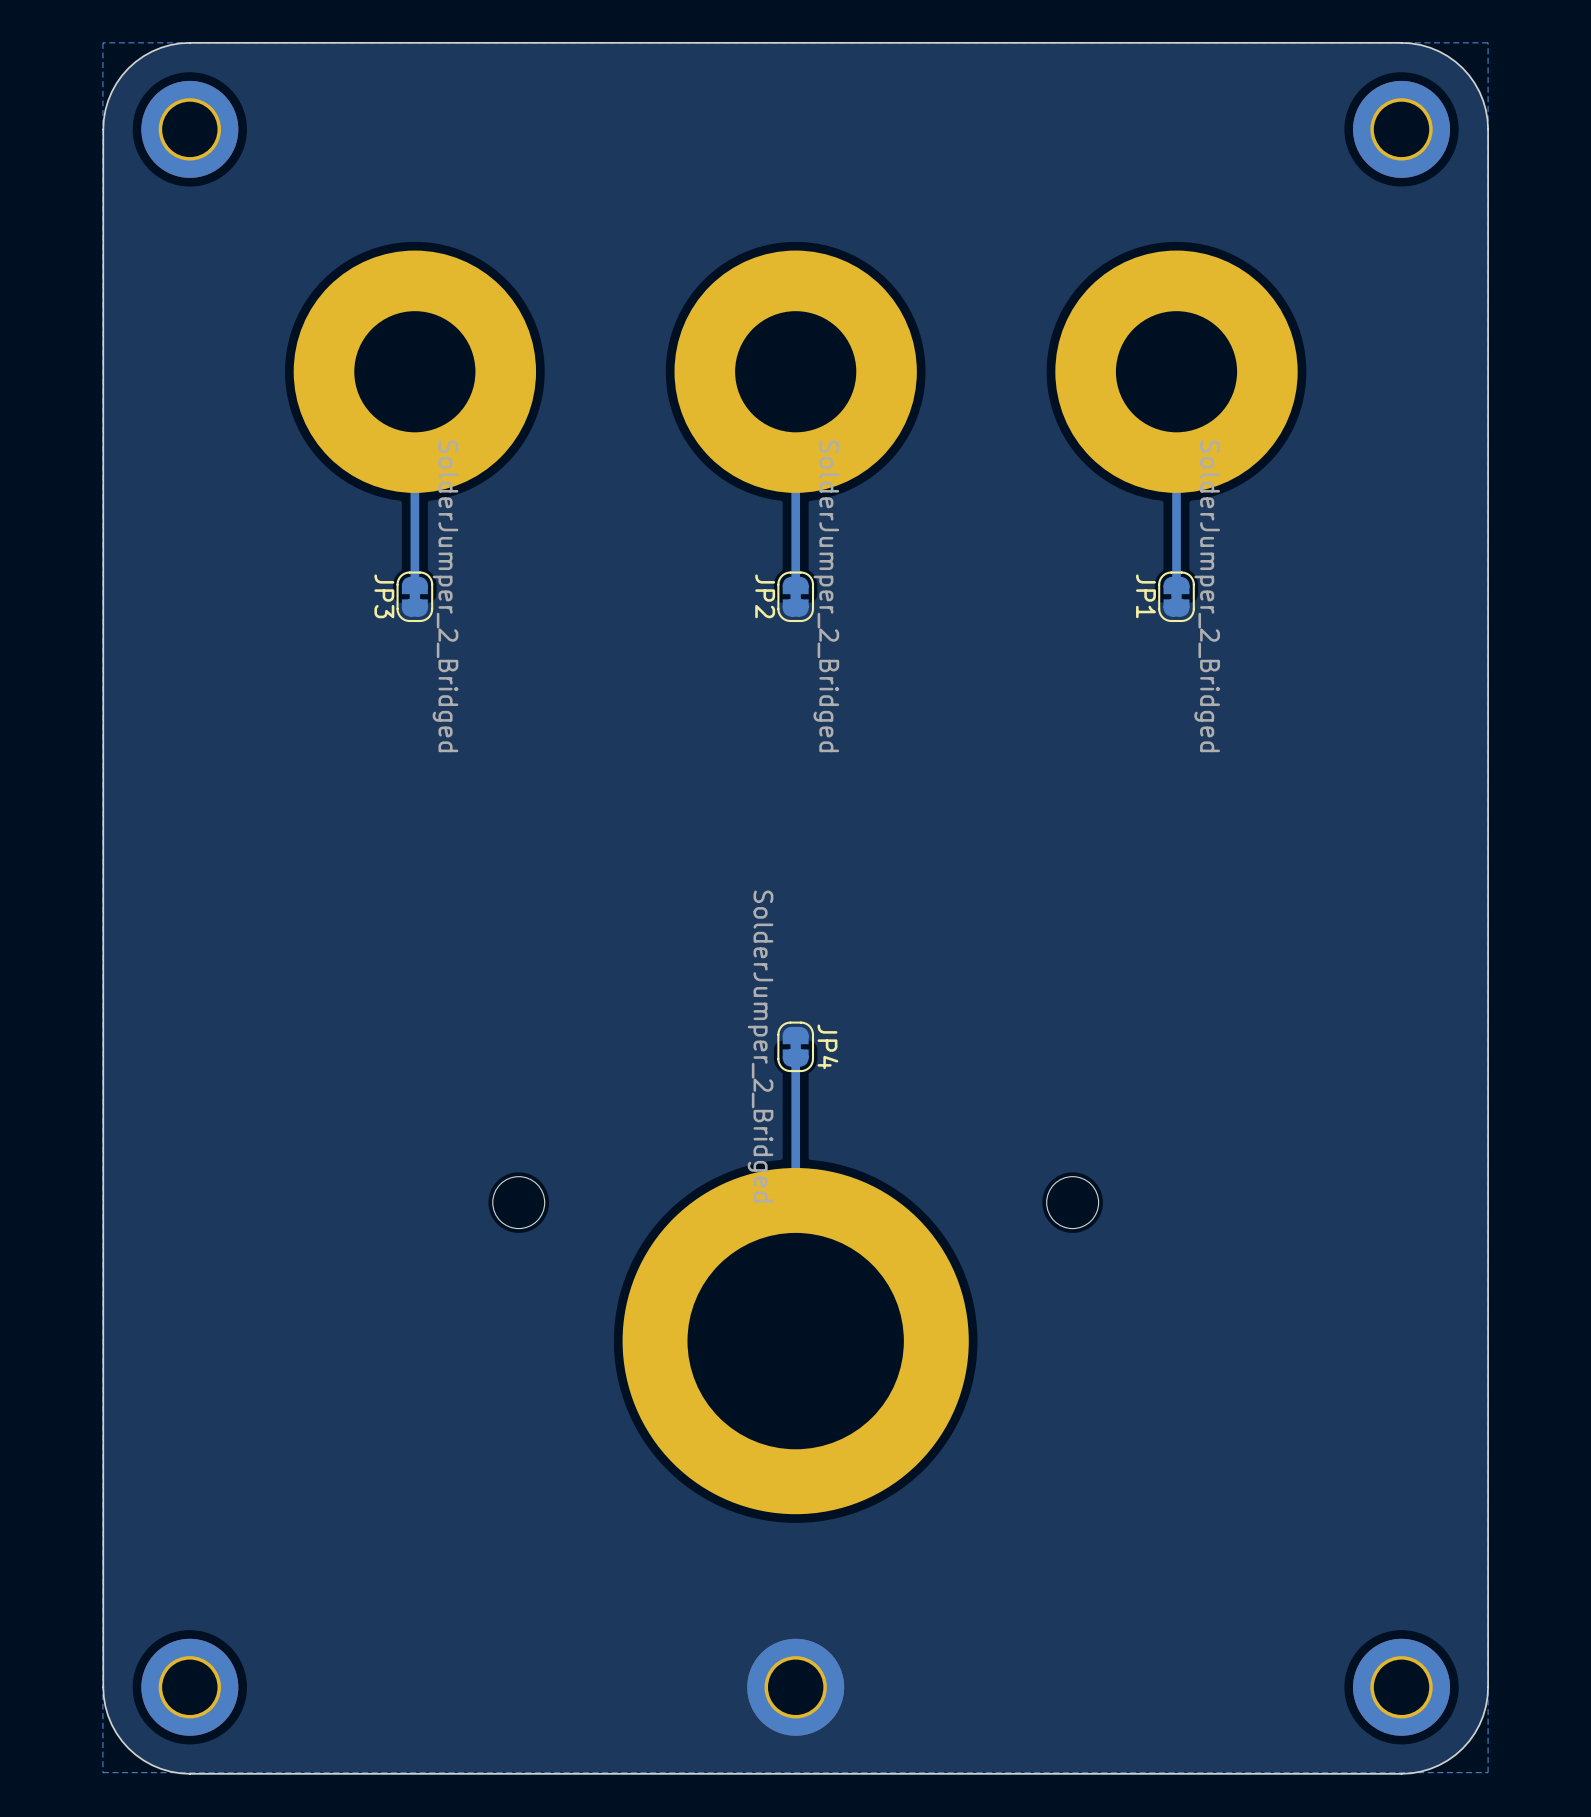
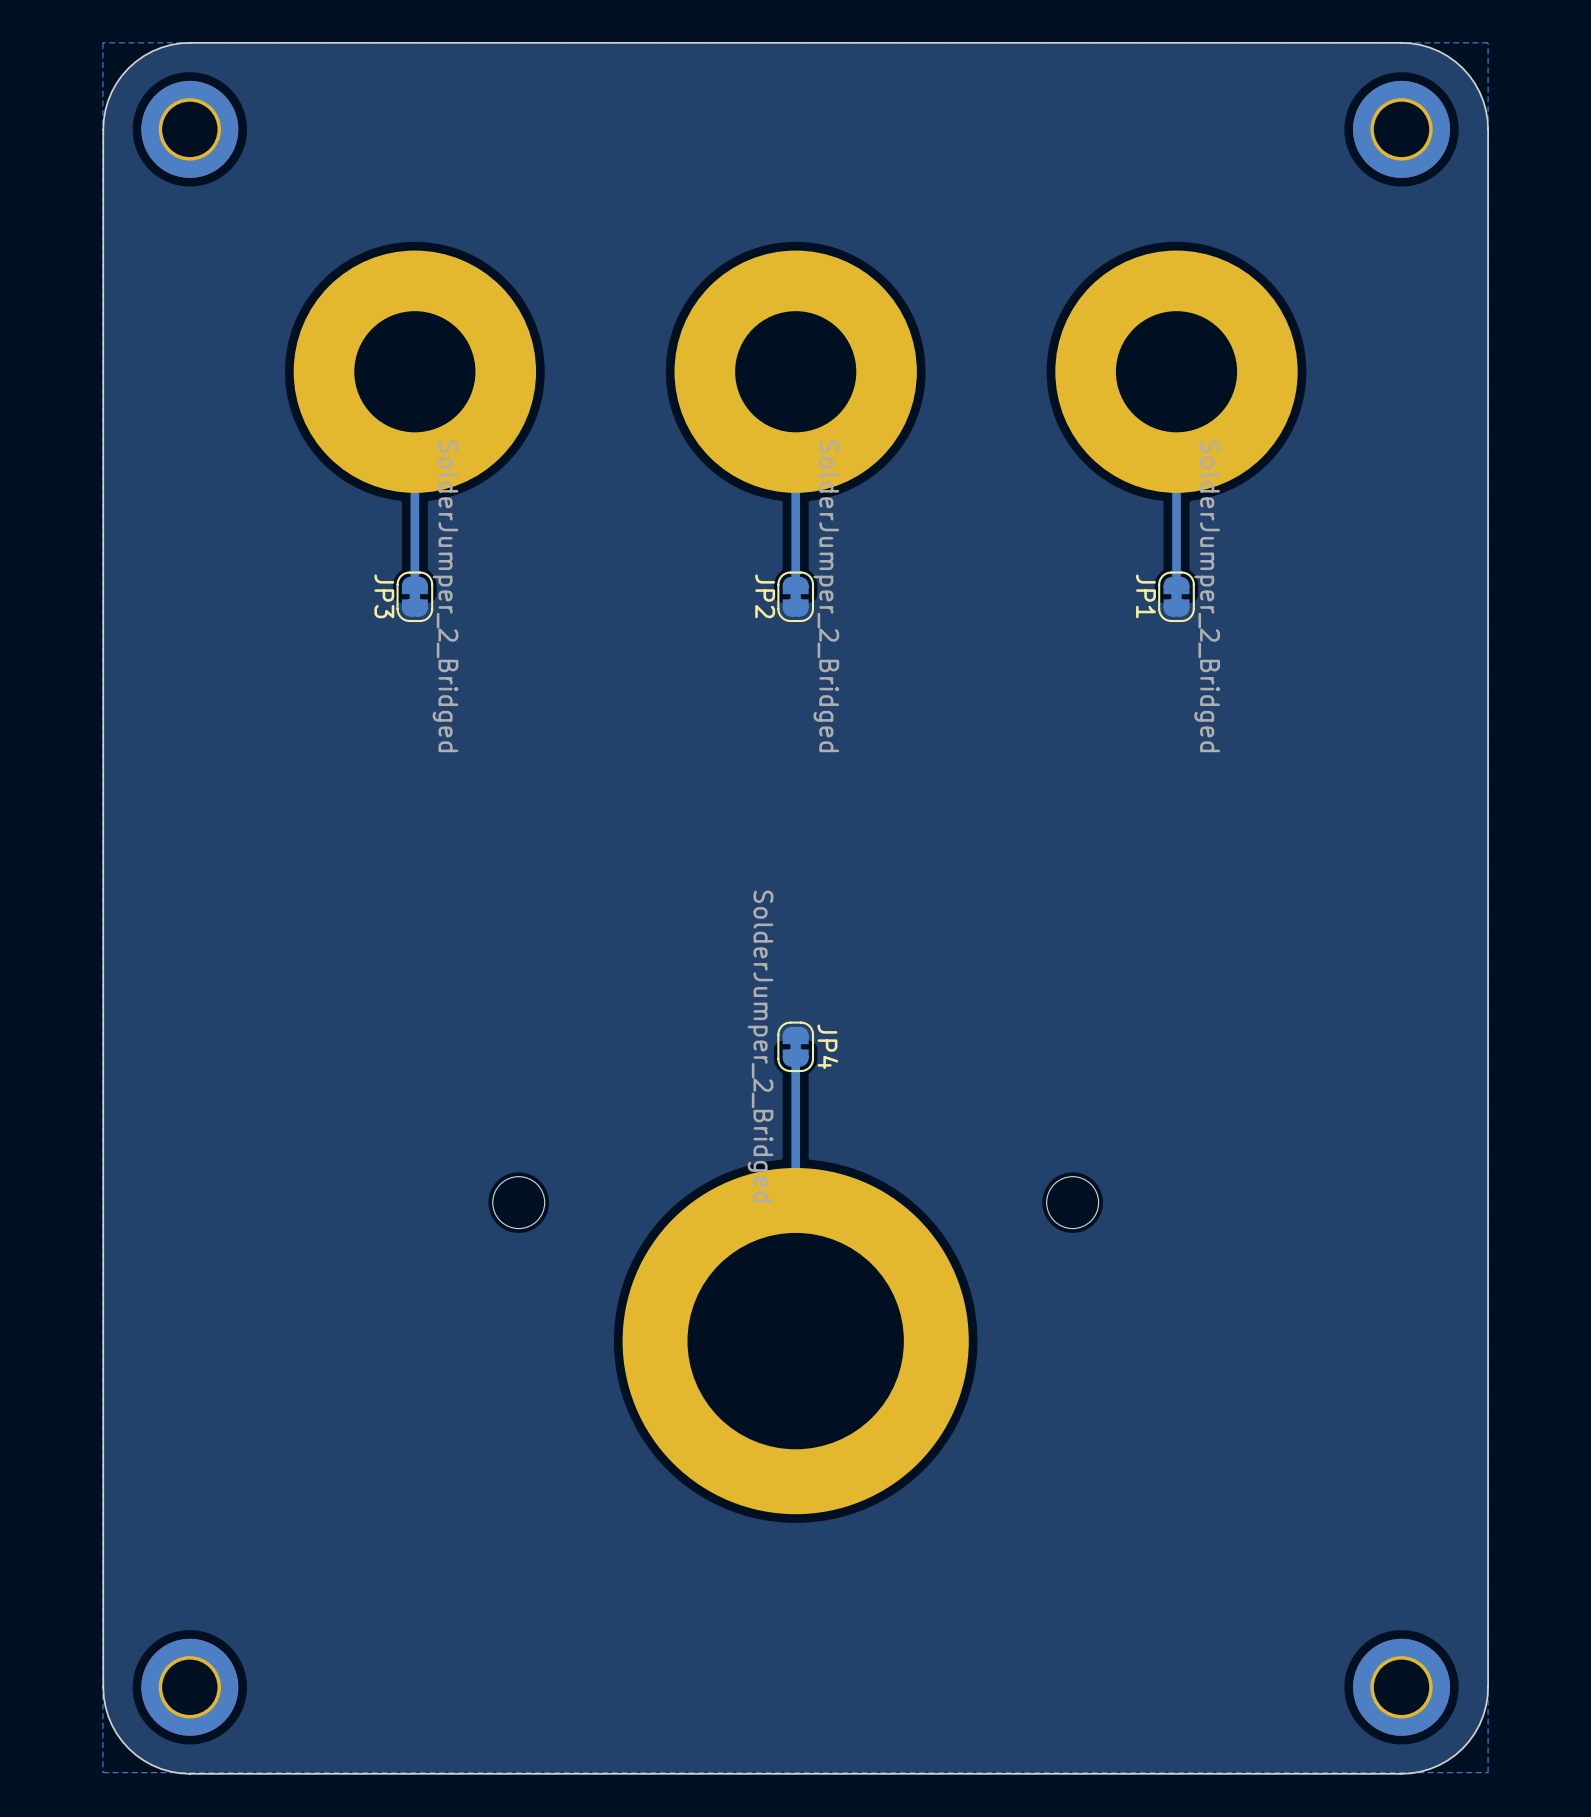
part: (795, 1687) -> none

